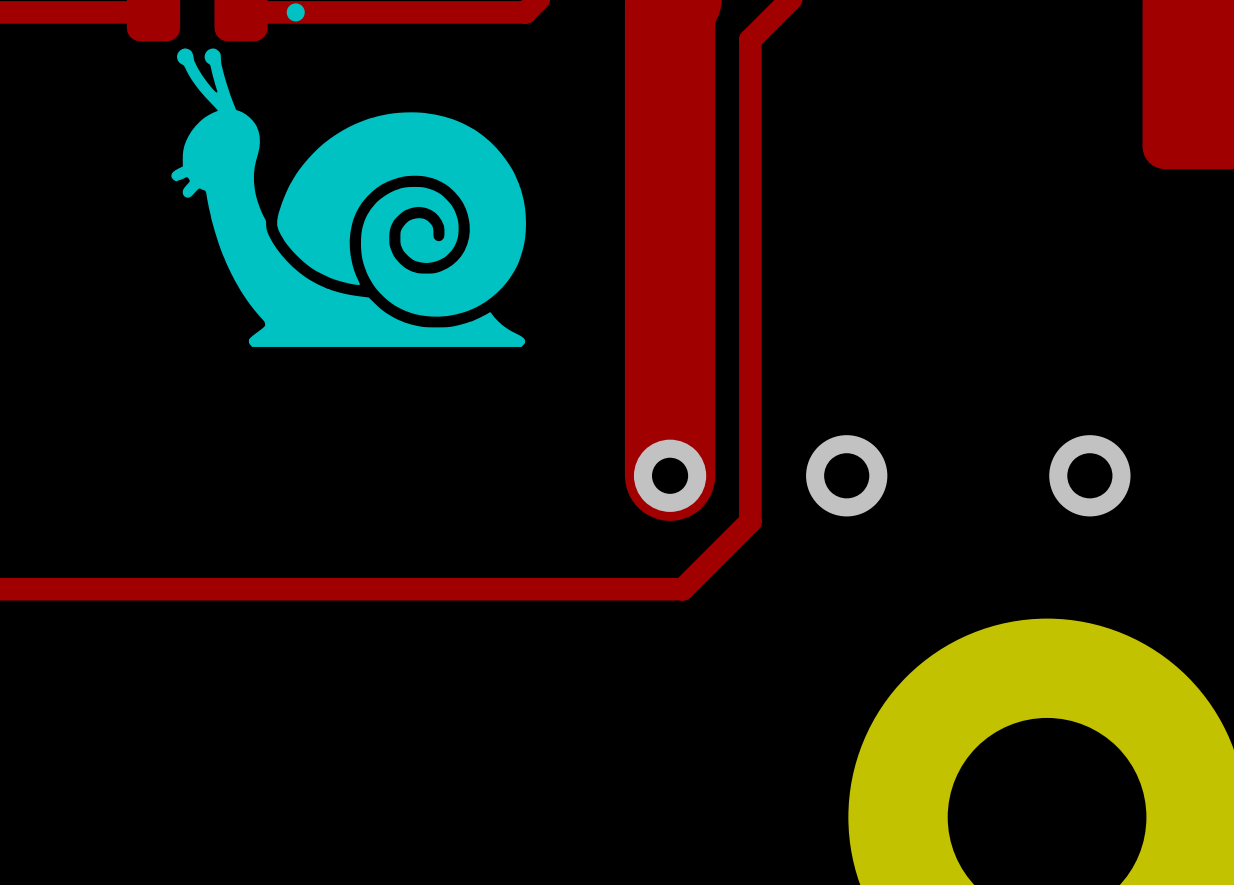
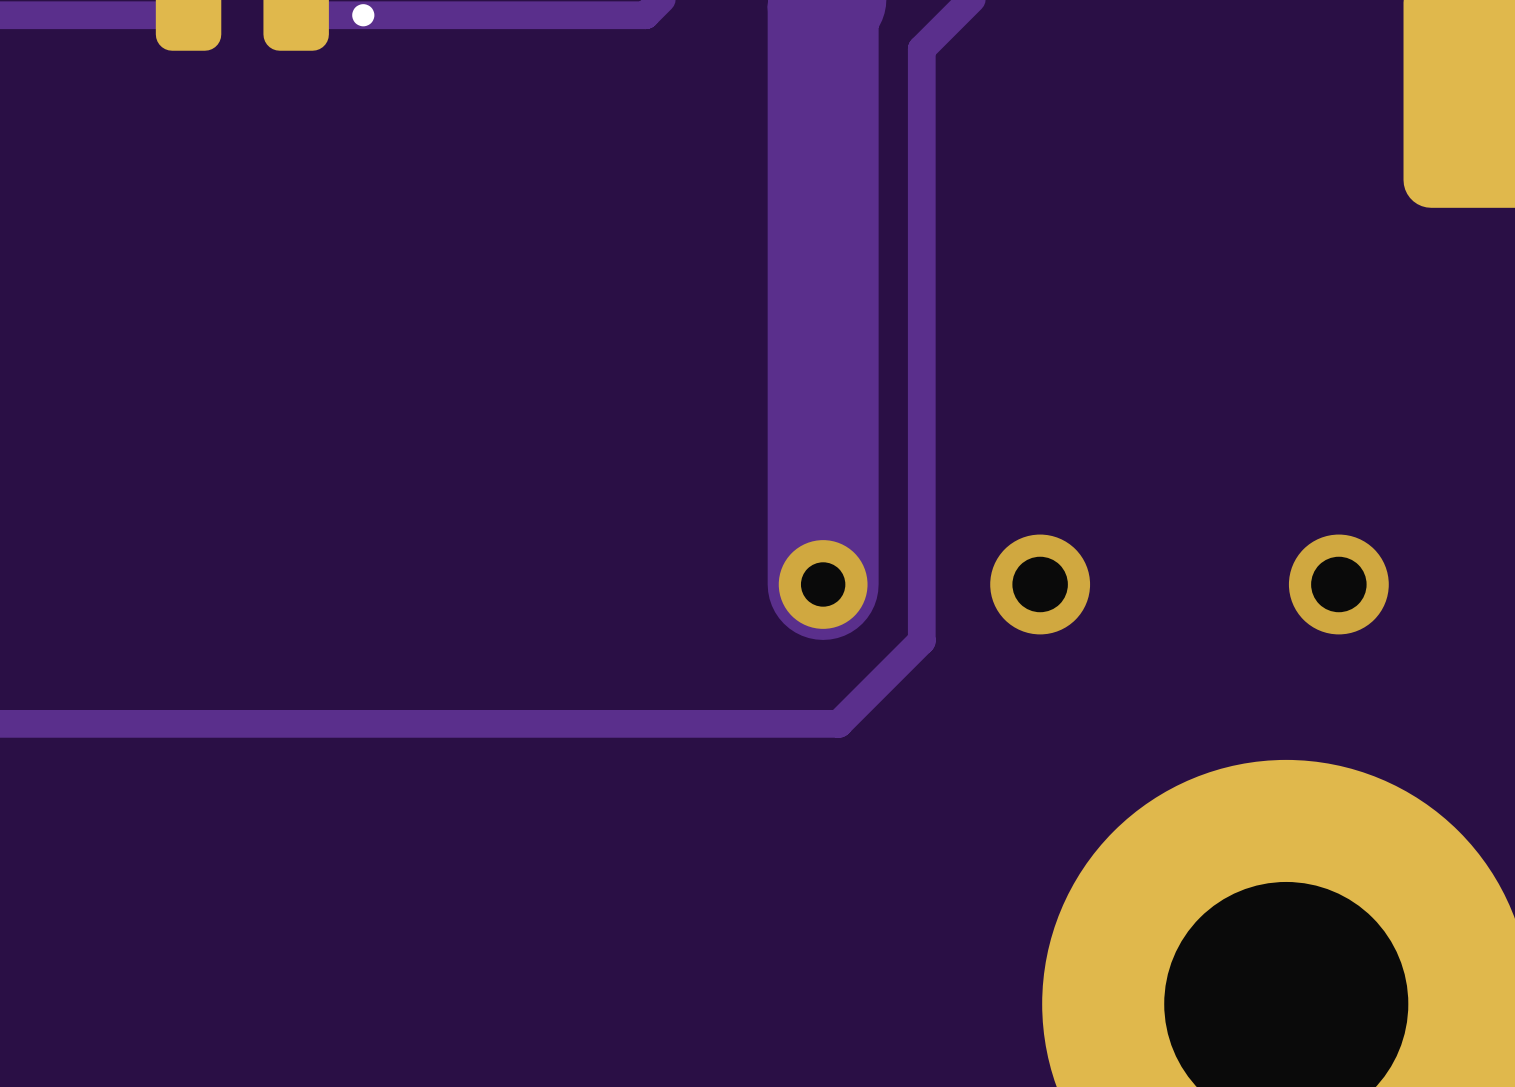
drawing: [171, 48, 526, 347] -> none

